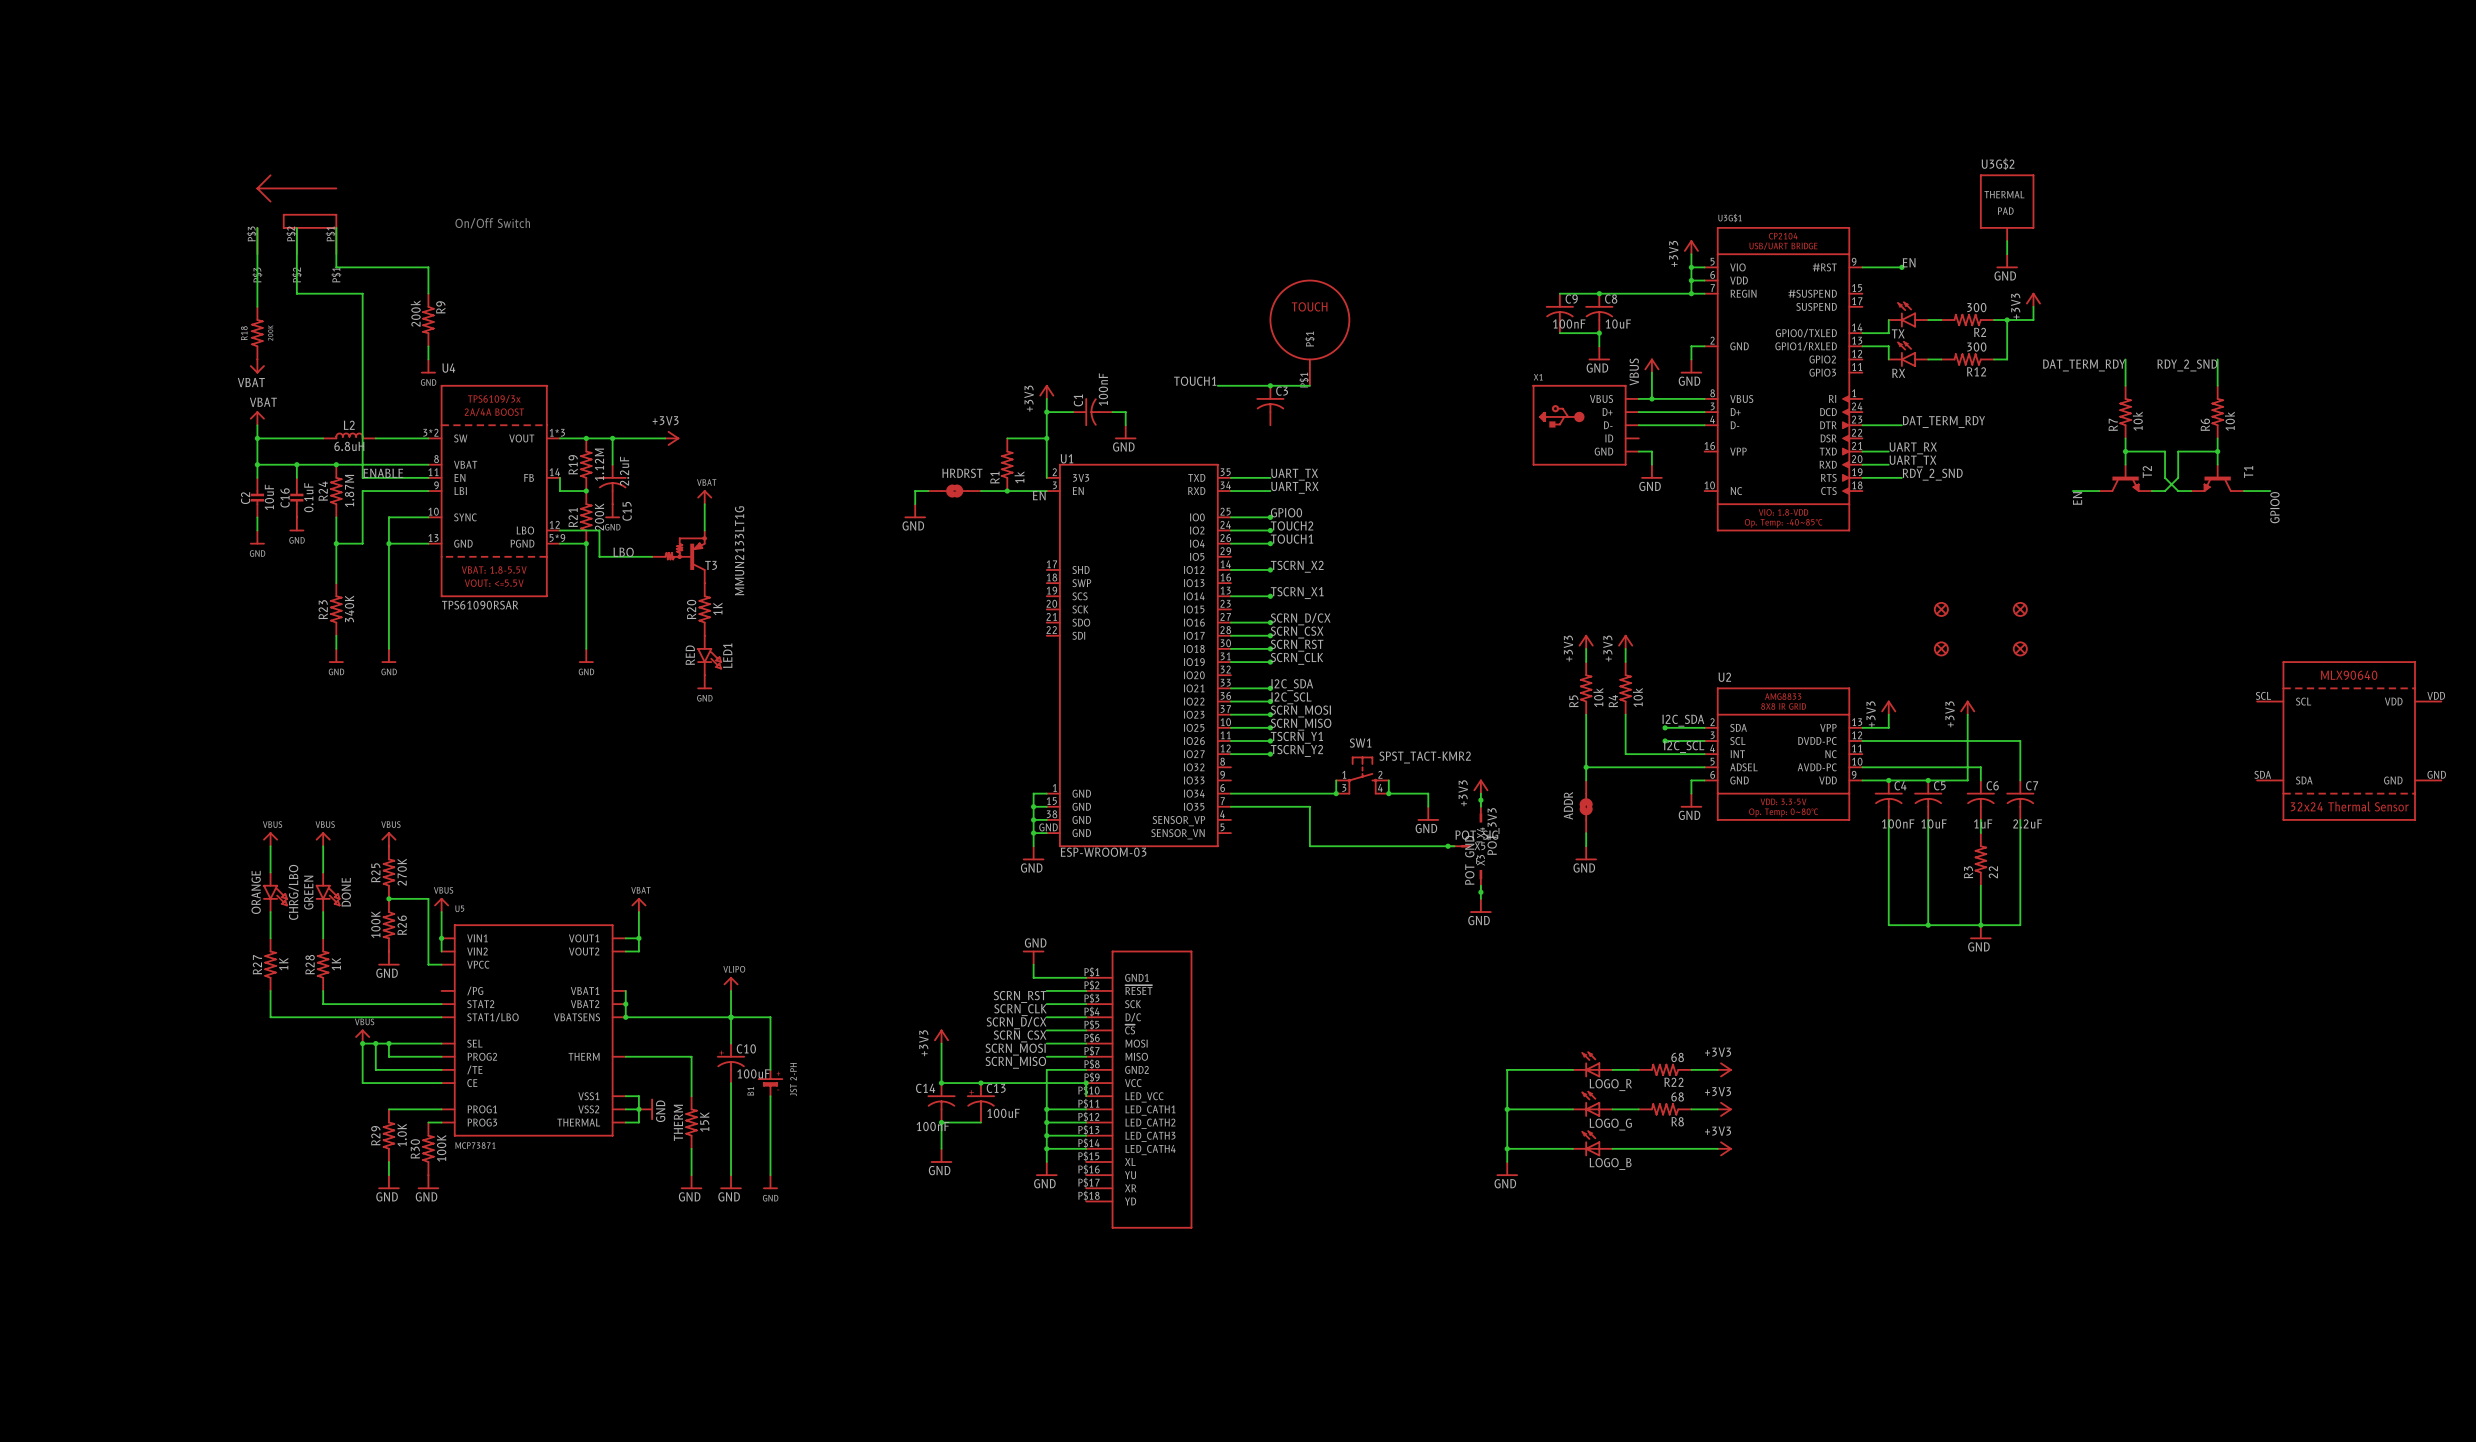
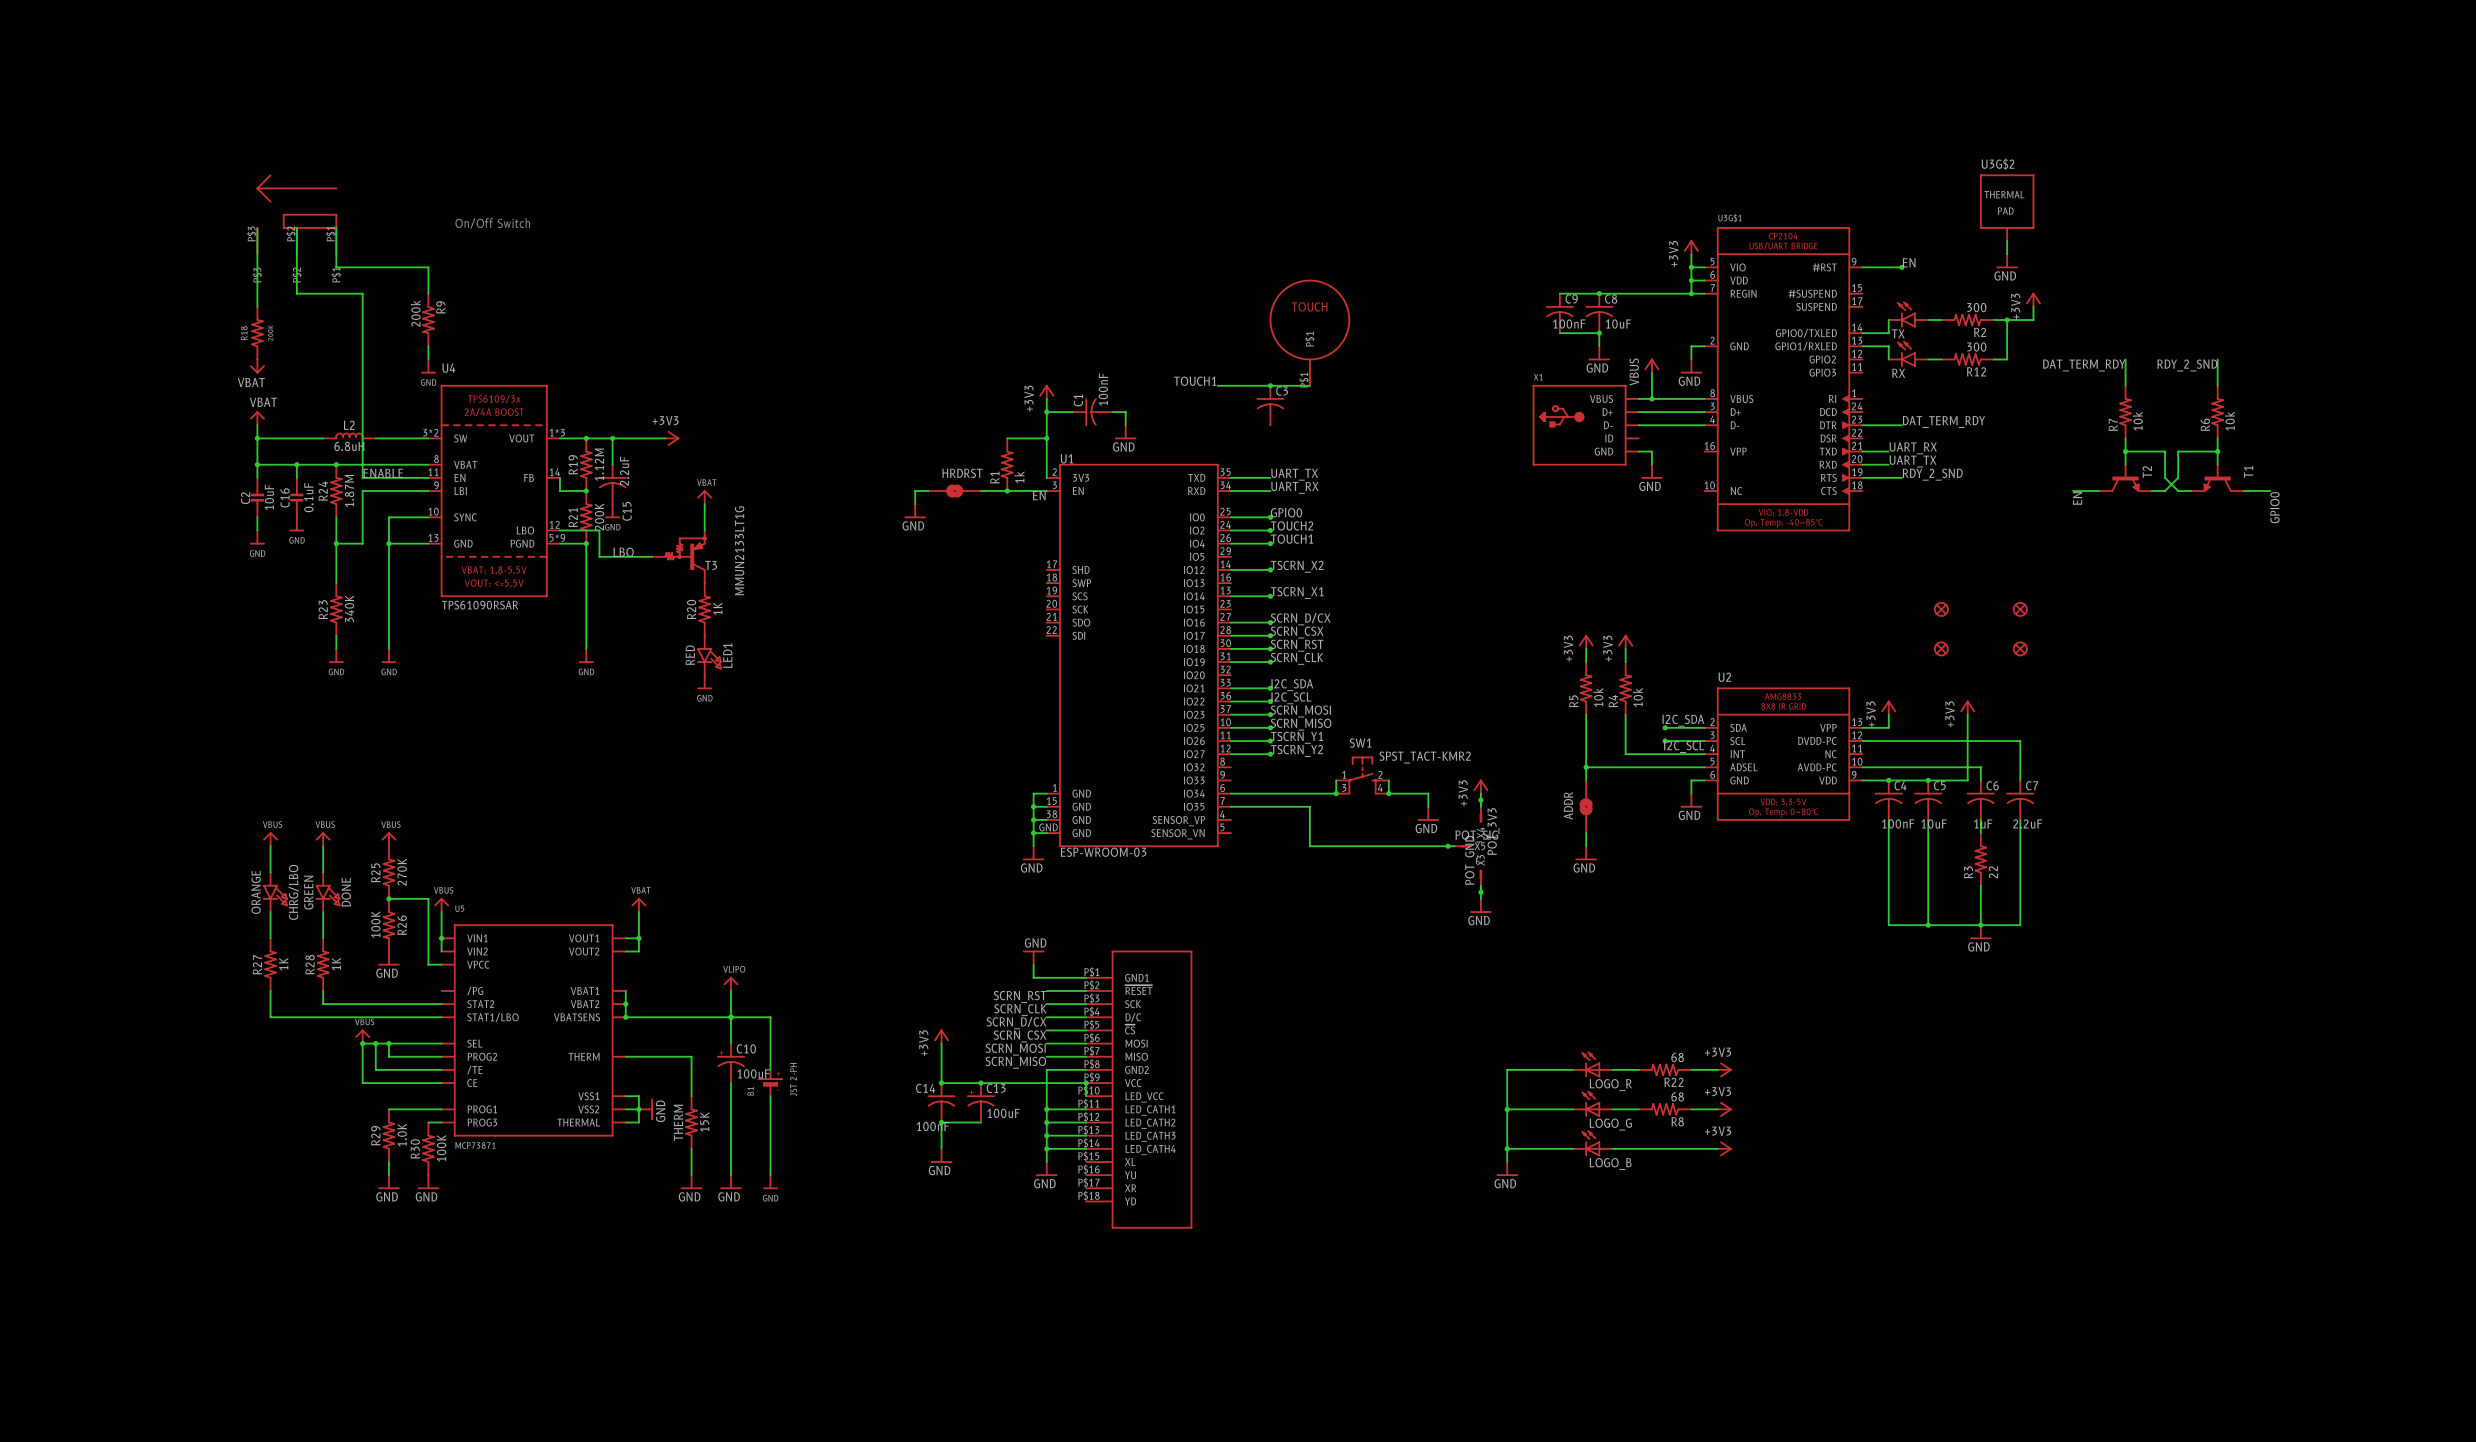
part: (2349, 741) -> none

